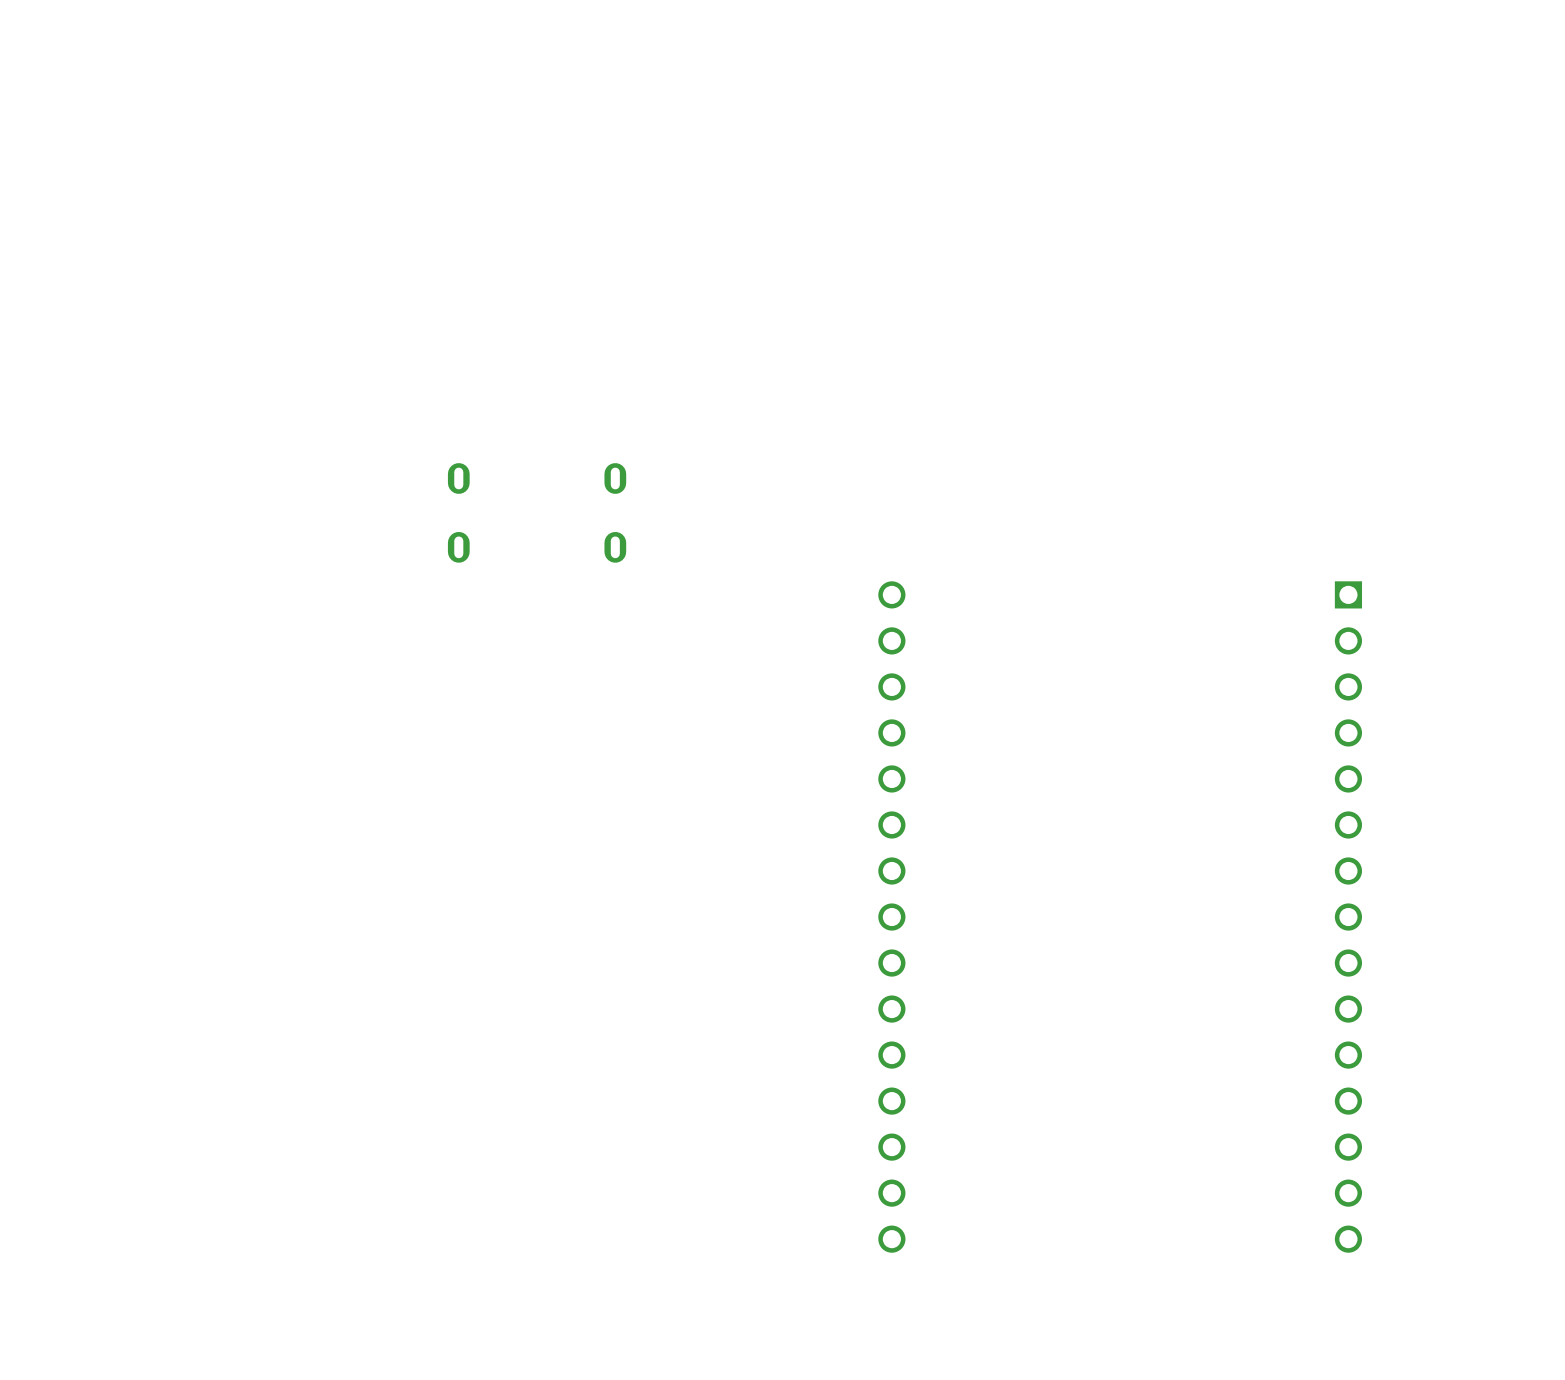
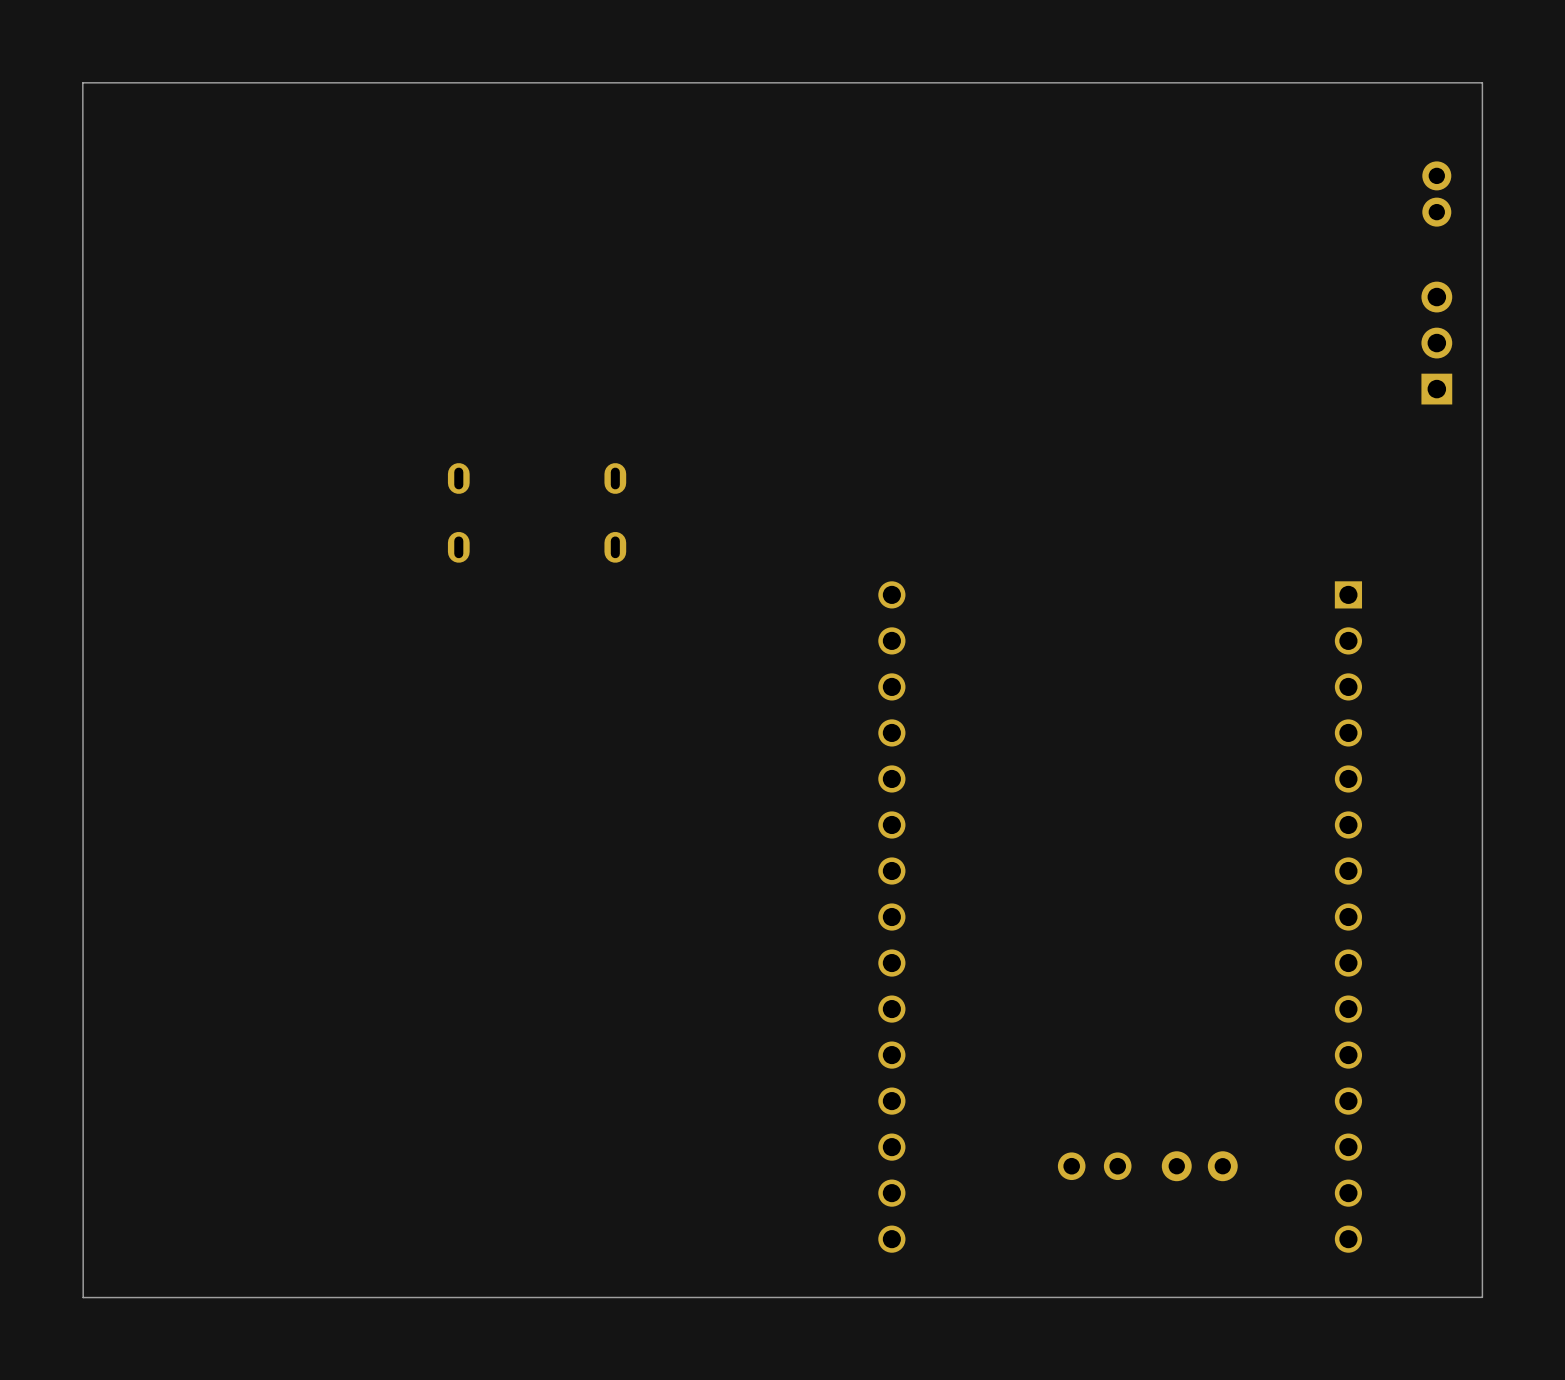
board edge: none -> (1482, 82) (1482, 1297) (83, 1297) (82, 82) (1482, 82)
part: none -> (1436, 194)
part: none -> (1436, 343)
part: none -> (1094, 1166)
part: none -> (1199, 1166)

